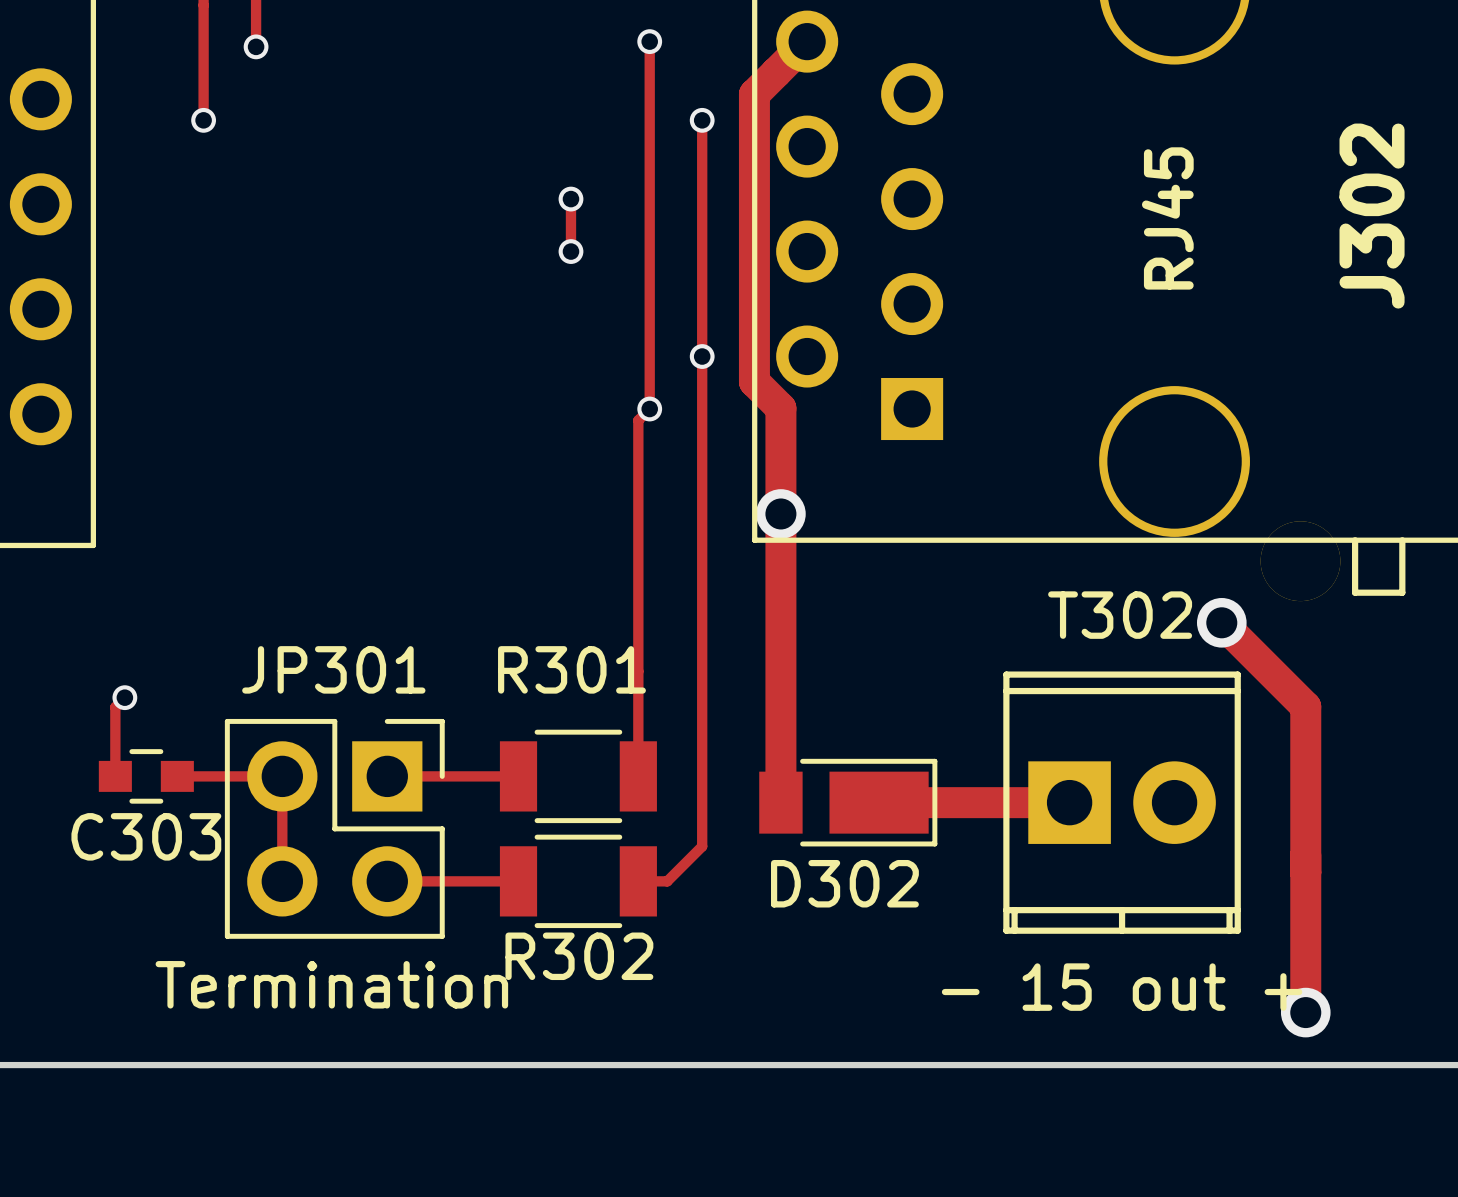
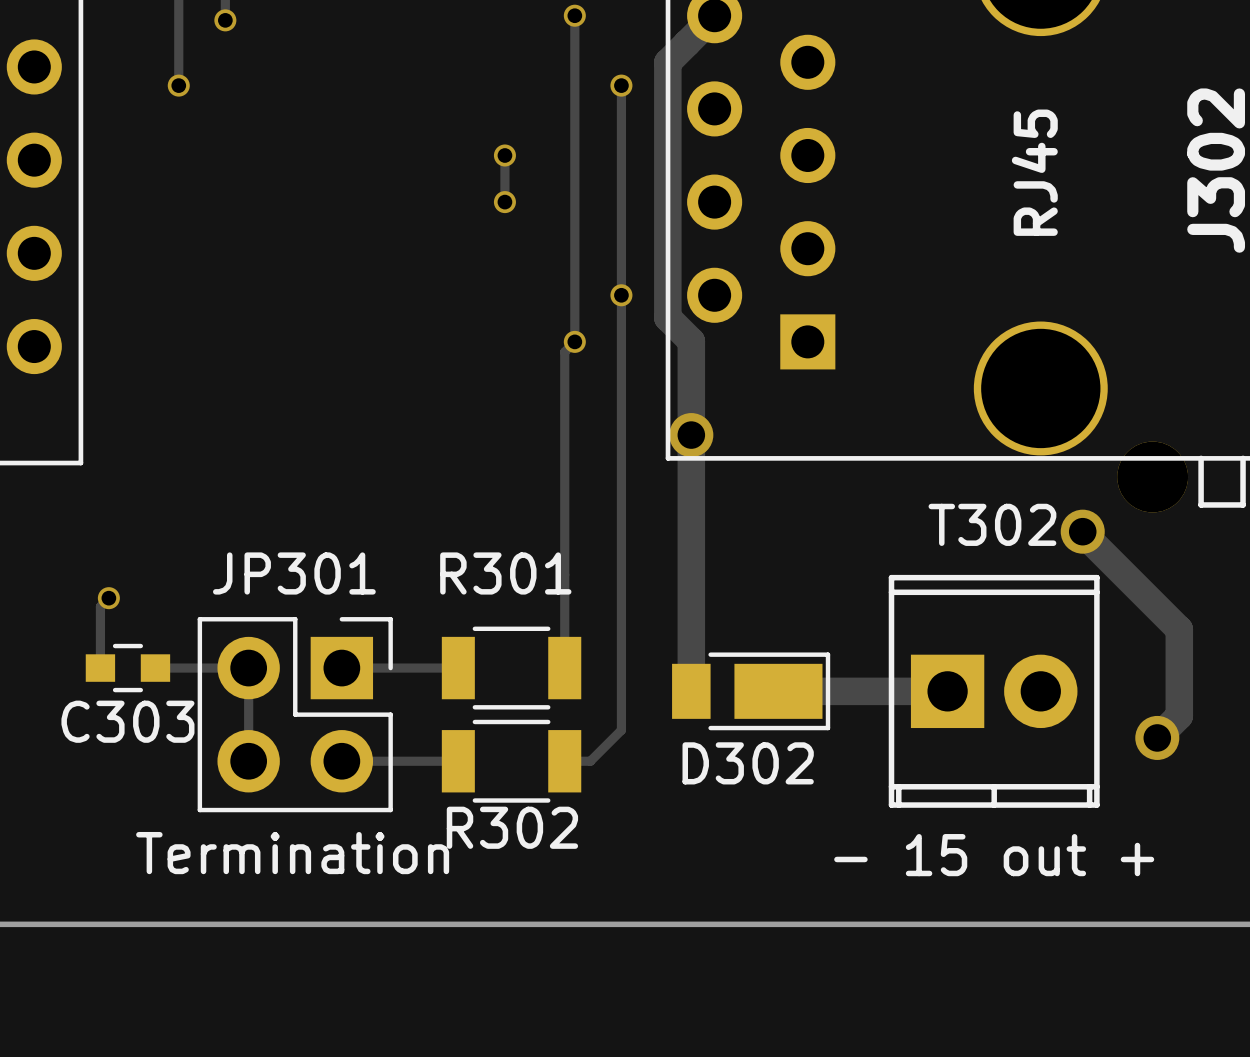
track: (1221, 622) (1305, 706) (1305, 1012) -> (1082, 531) (1179, 629) (1179, 715) (1157, 737)
via position: (1305, 1012) -> (1157, 737)

